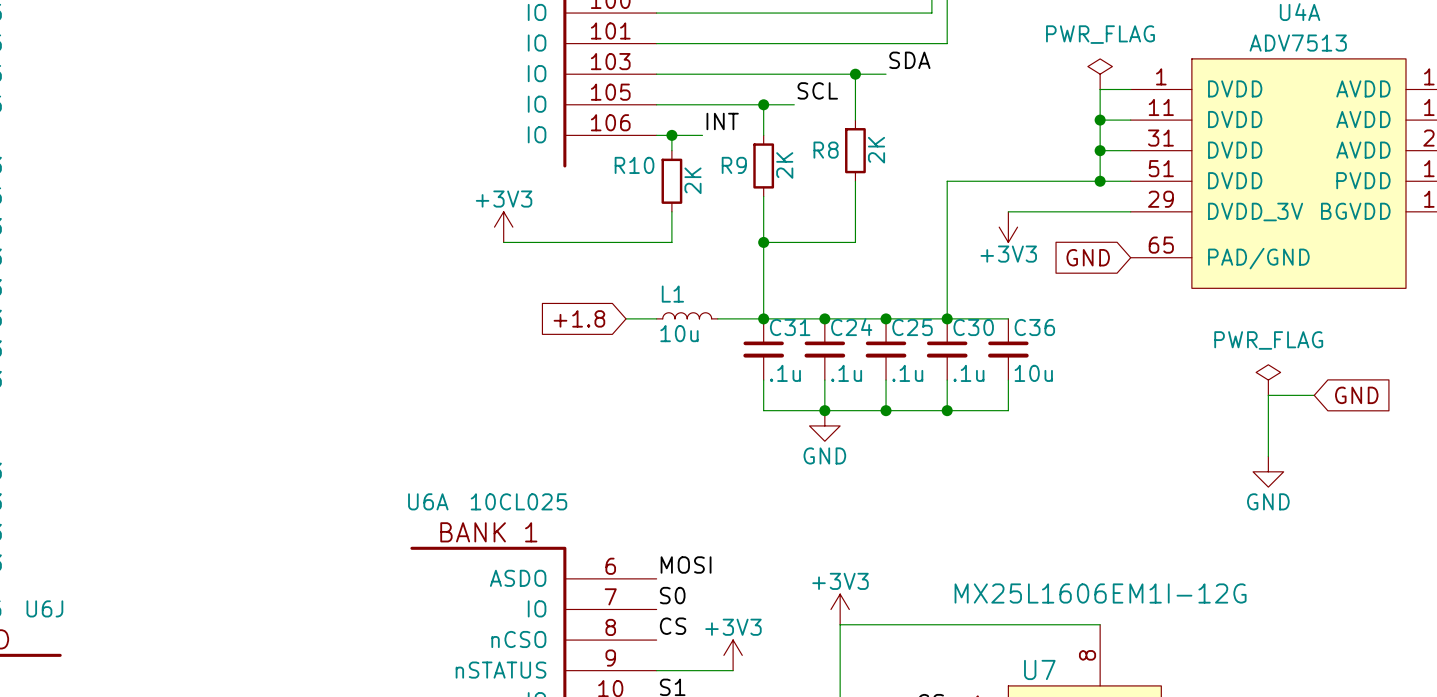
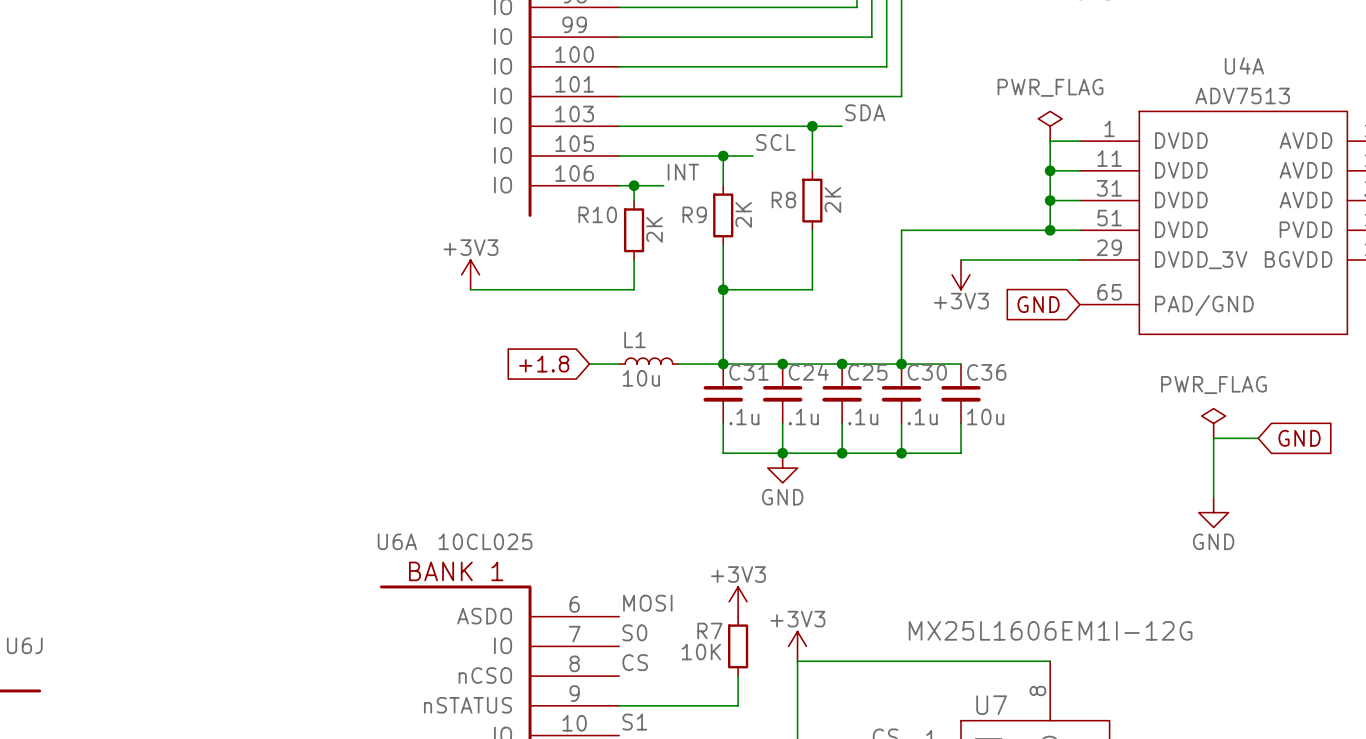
R7: none -> 10K (738, 646)
wire: none -> (738, 676) (738, 705) (693, 705)
power symbol position: +3V3 (733, 655) -> +3V3 (738, 601)

